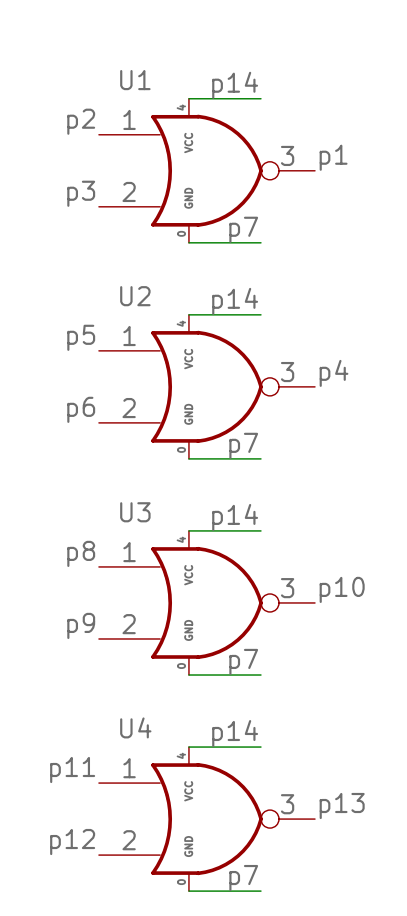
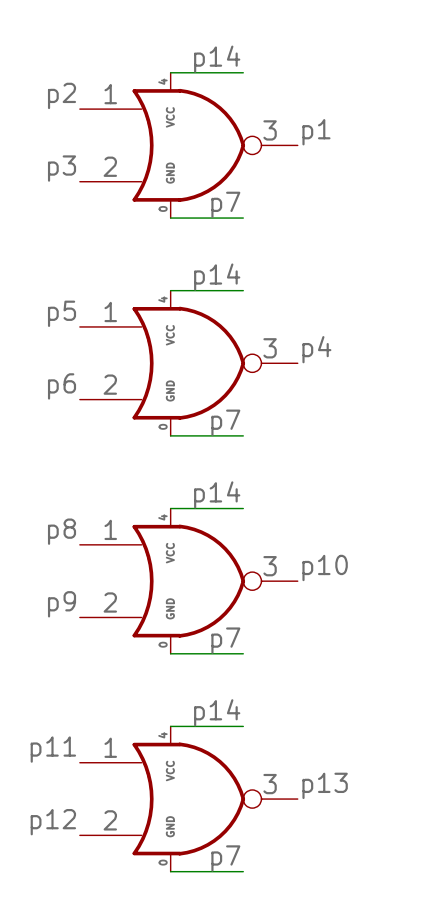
U1 name: U1 (135, 80) -> none
U2 name: U2 (135, 296) -> none
U3 name: U3 (135, 512) -> none
U4 name: U4 (135, 727) -> none

